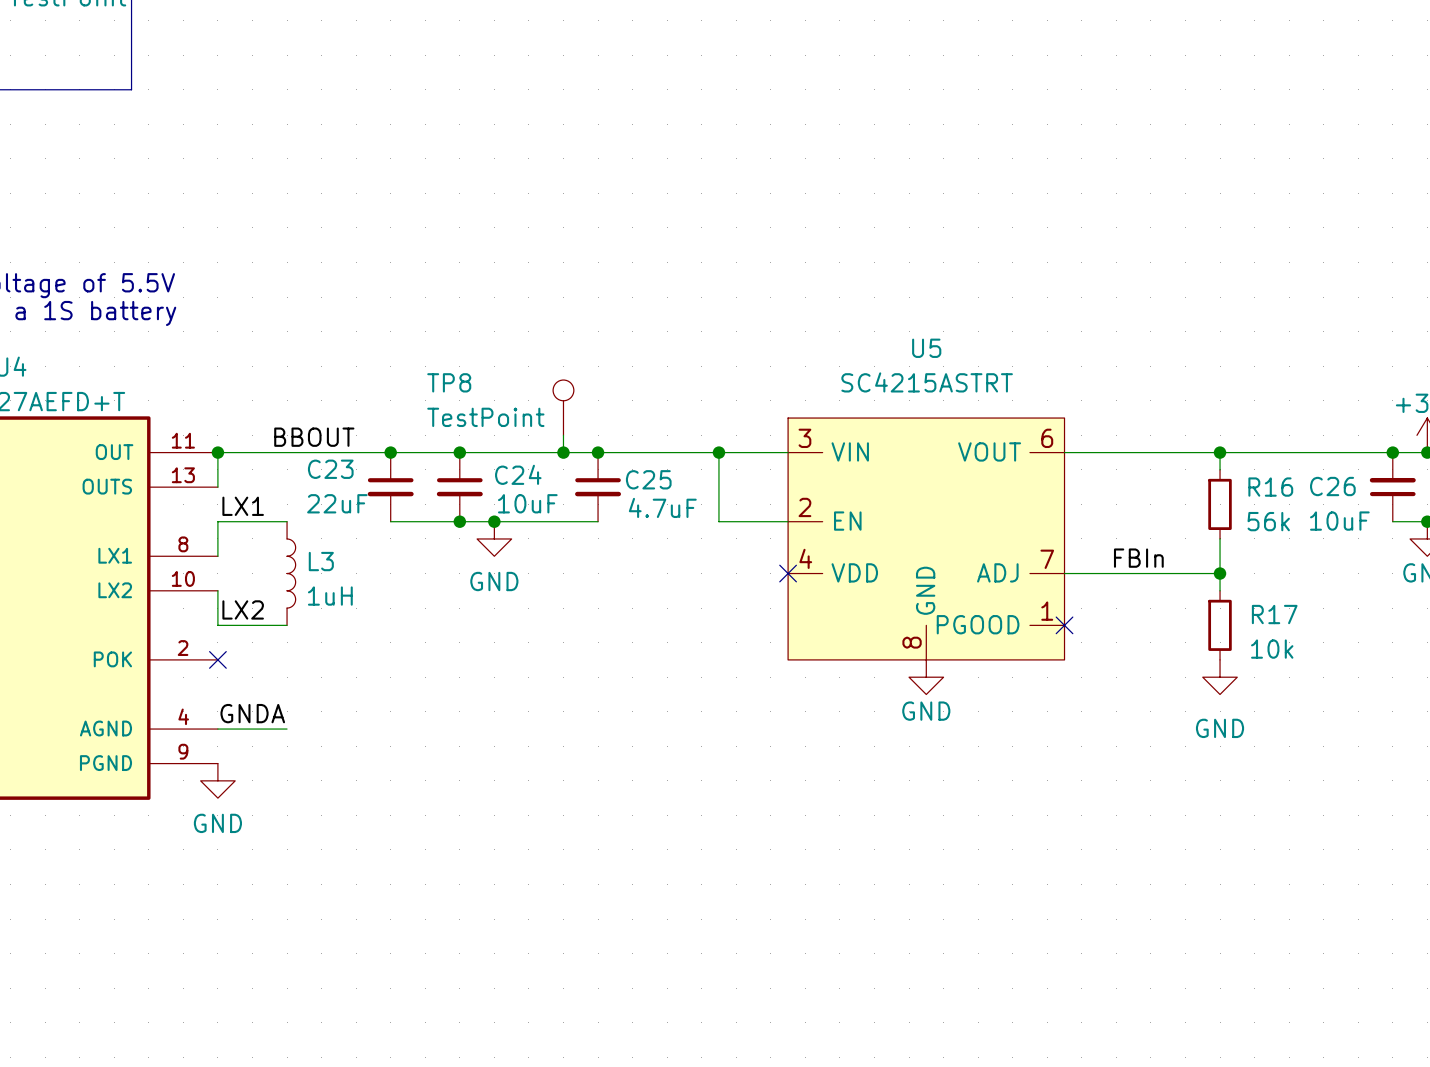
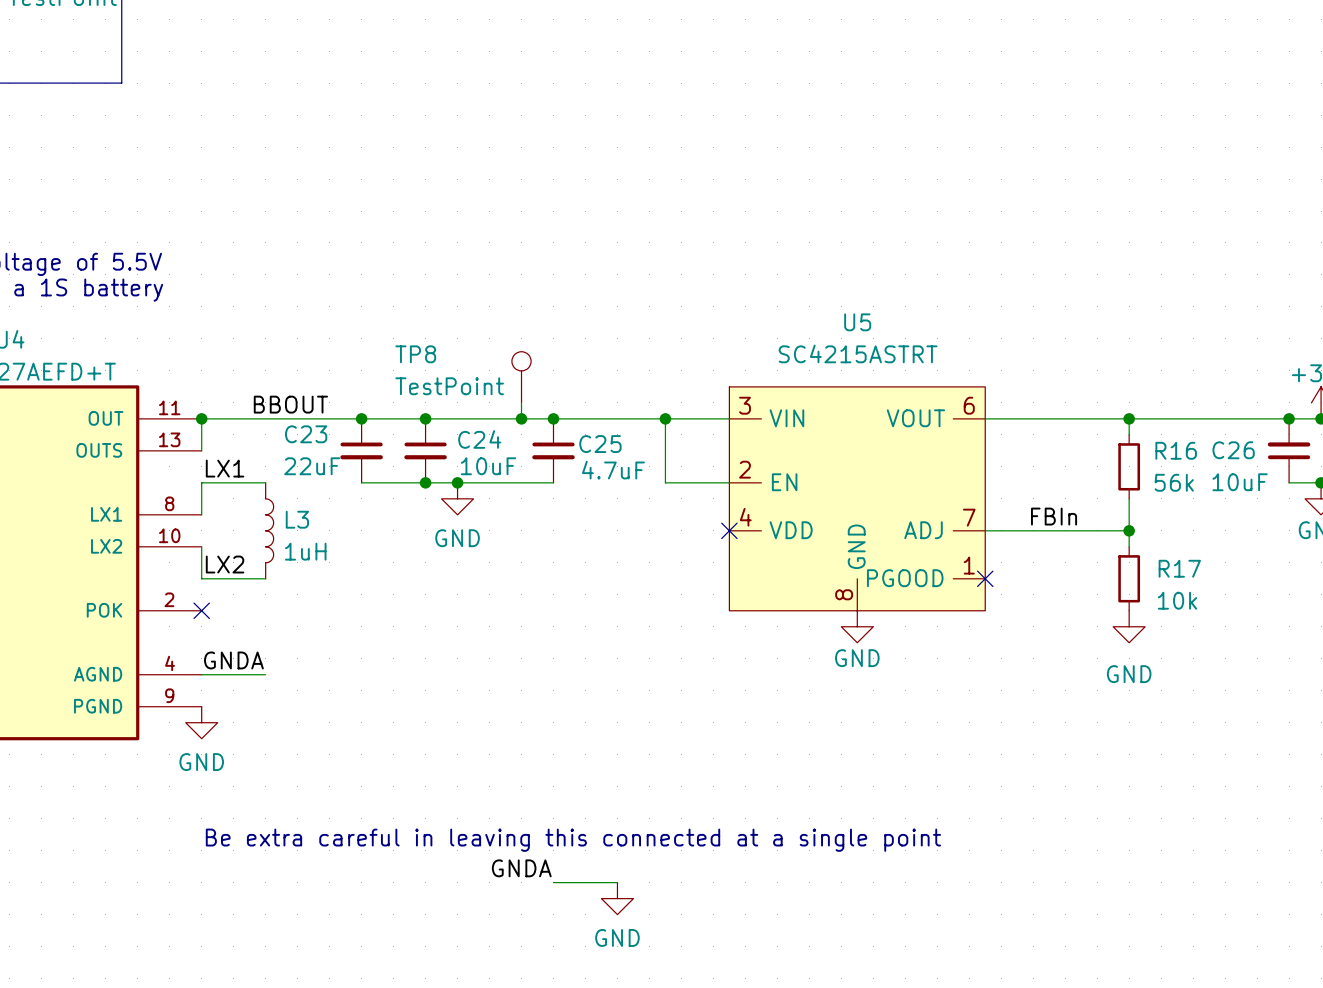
text: none -> Be extra careful in leaving this connected at a single point (573, 840)
label: none -> GNDA (521, 868)
wire: none -> (553, 882) (617, 882)
power symbol: none -> GND (617, 898)

